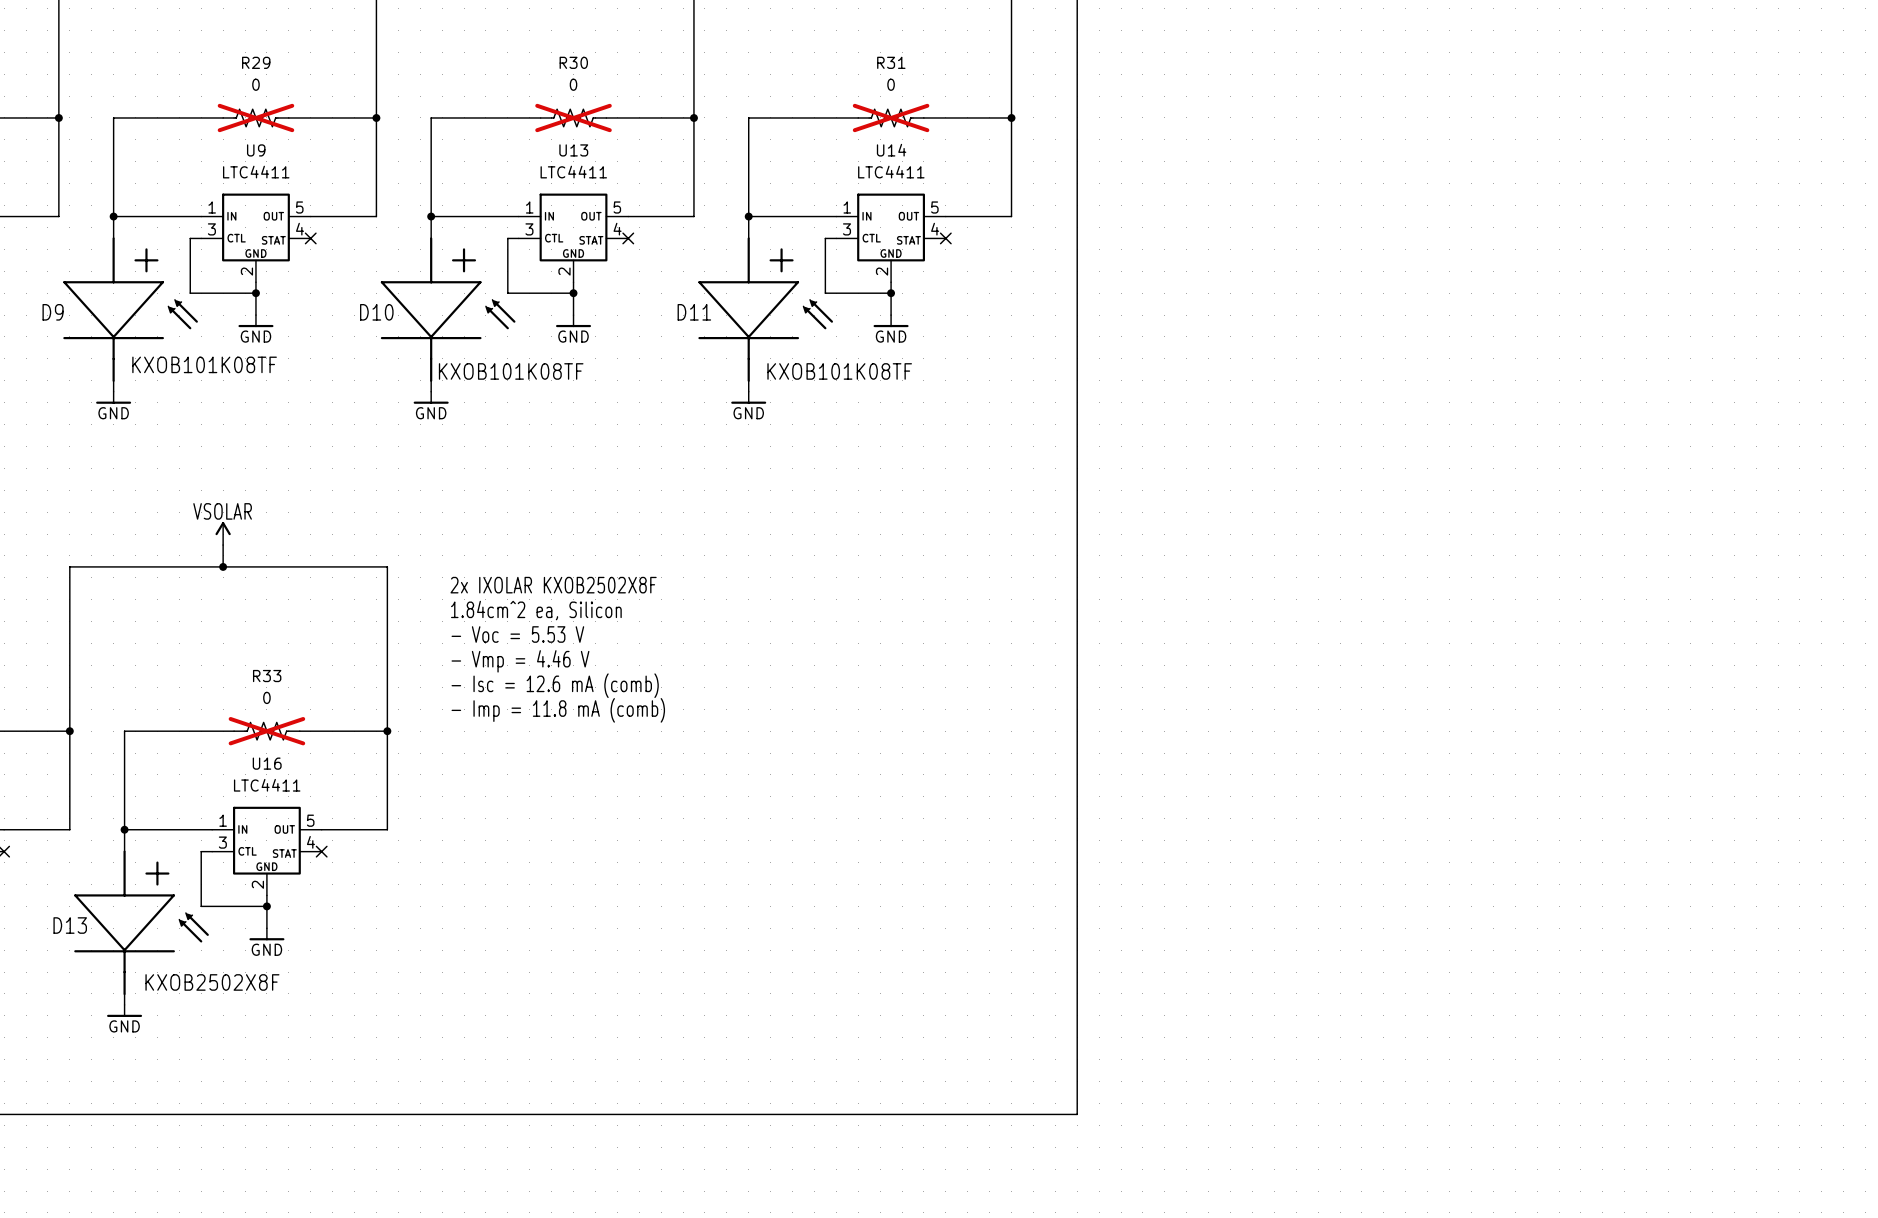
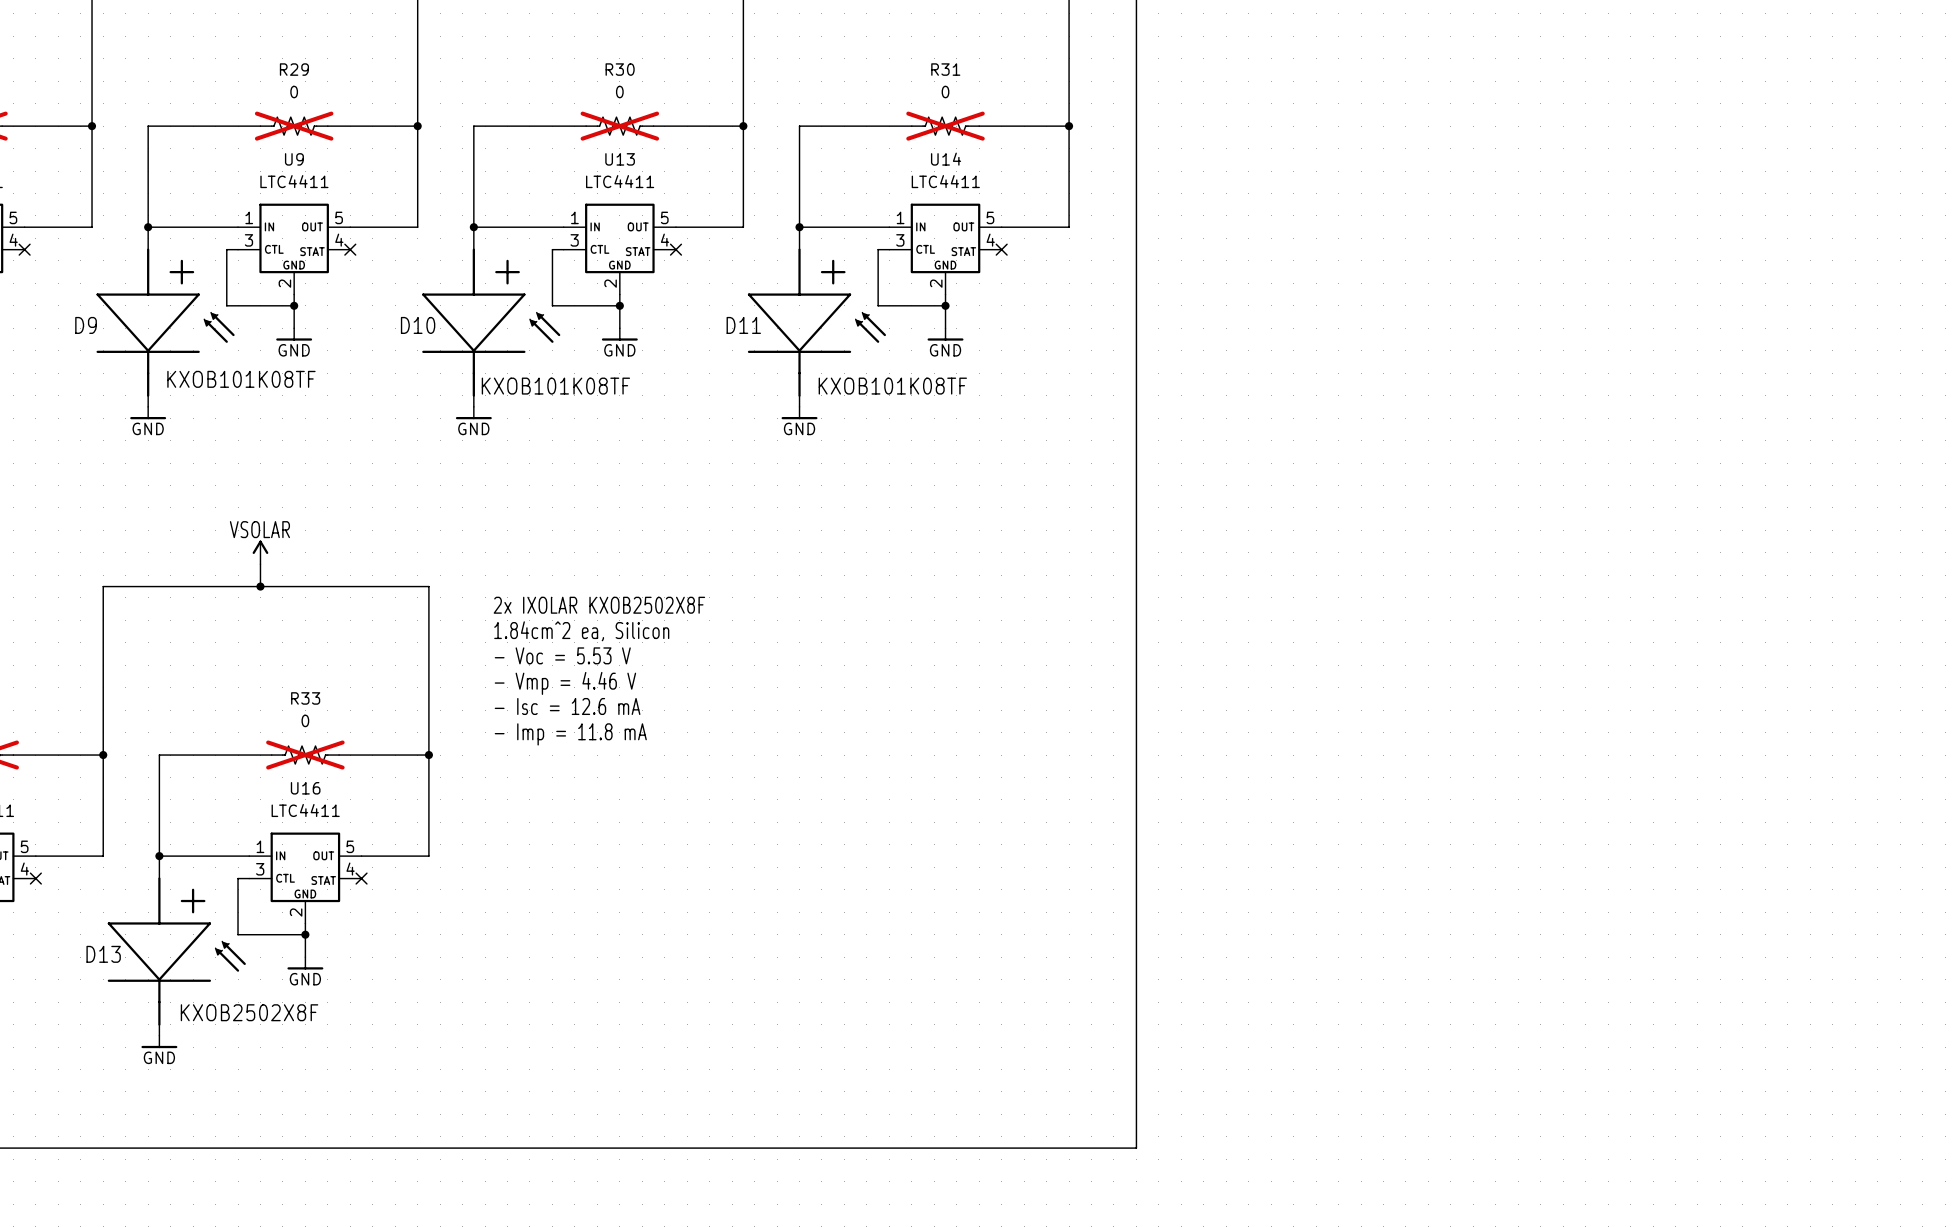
text: - Isc = 12.6 mA (comb) (555, 685) -> - Isc = 12.6 mA (567, 706)
text: - Imp = 11.8 mA (comb) (558, 710) -> - Imp = 11.8 mA (570, 734)

